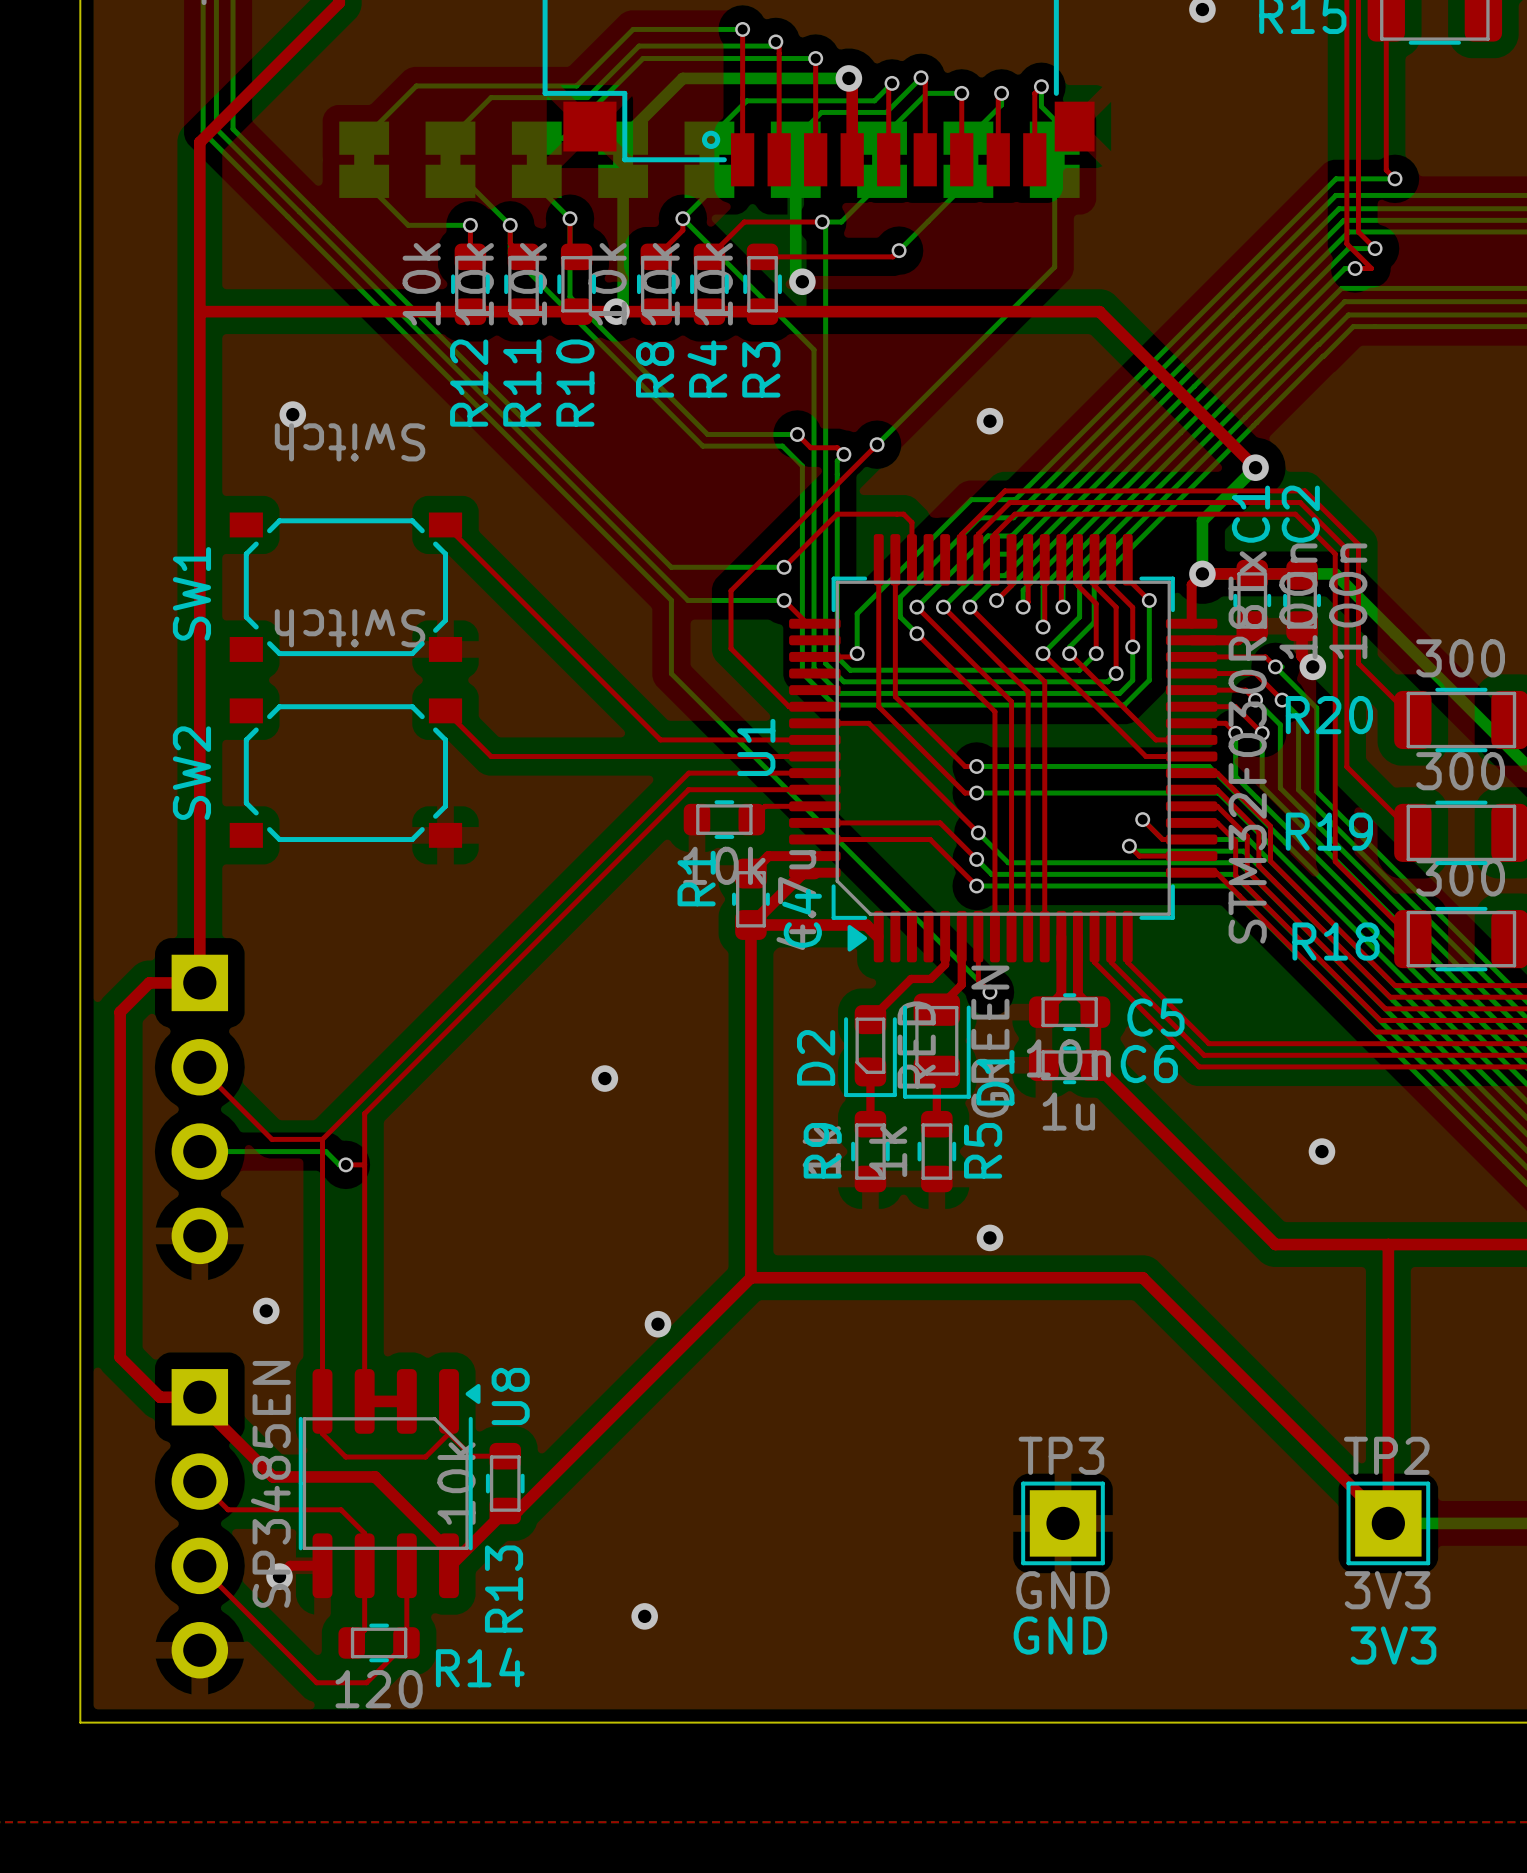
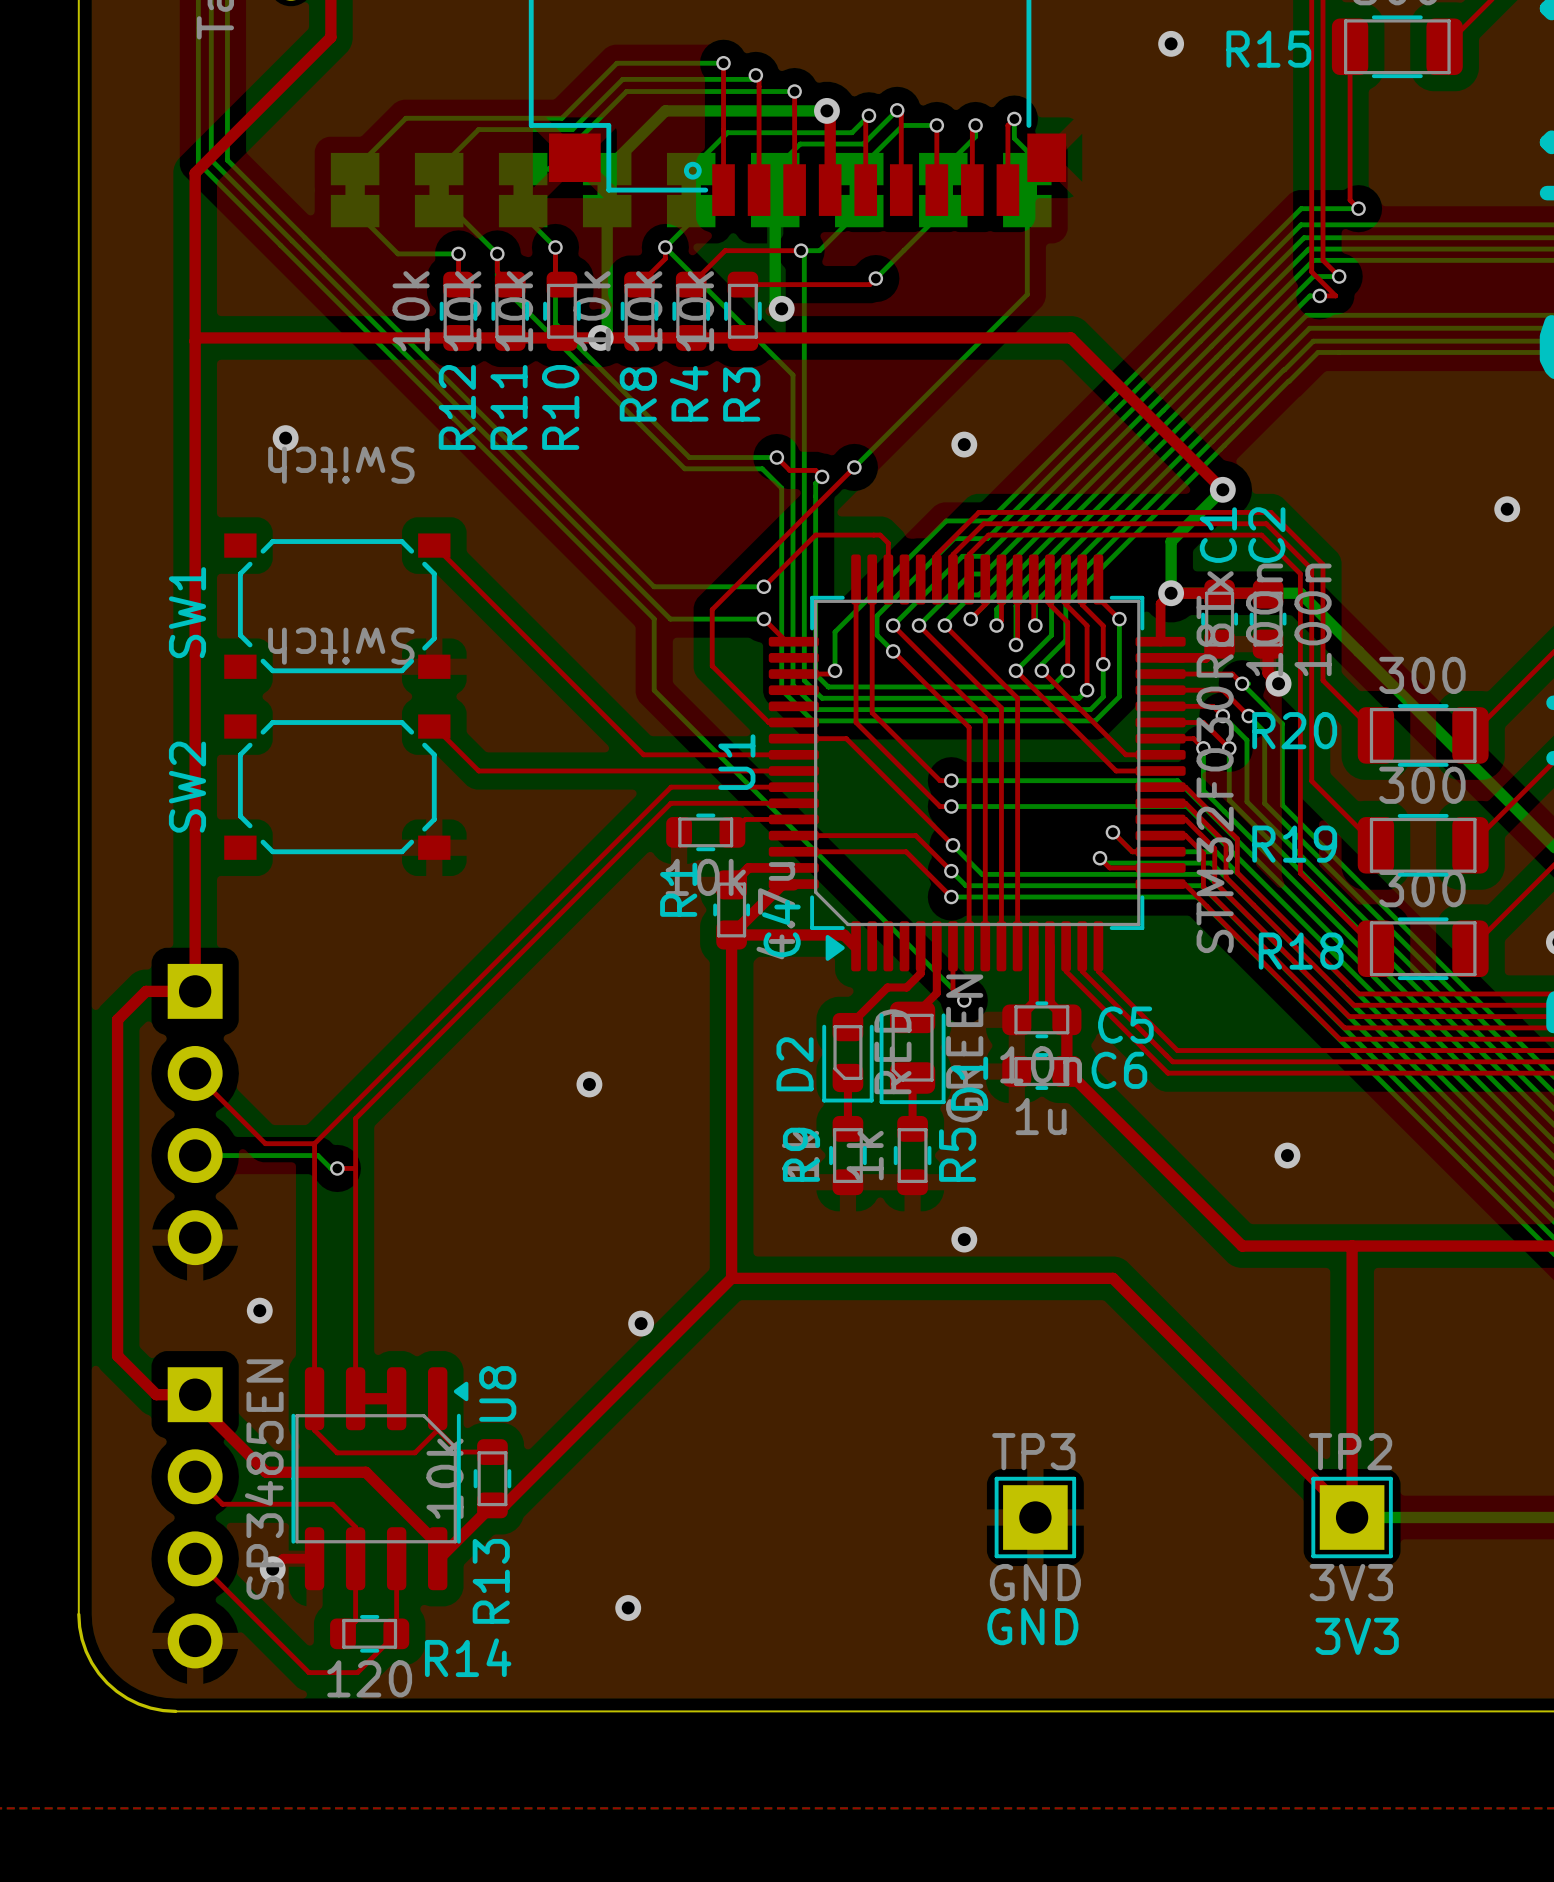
board edge: (80, 1623) (80, 1722) (179, 1722) -> (78, 1614) (82, 1639) (86, 1651) (91, 1662) (107, 1683) (116, 1691) (138, 1704) (150, 1708) (175, 1711)

